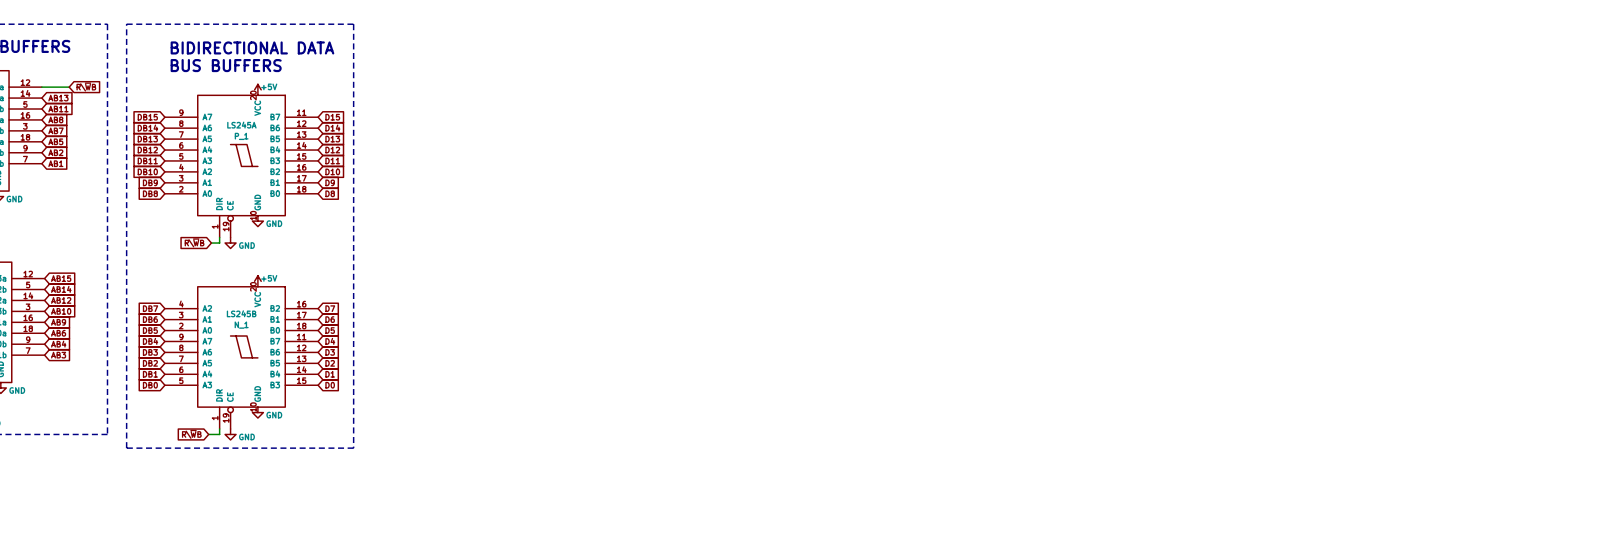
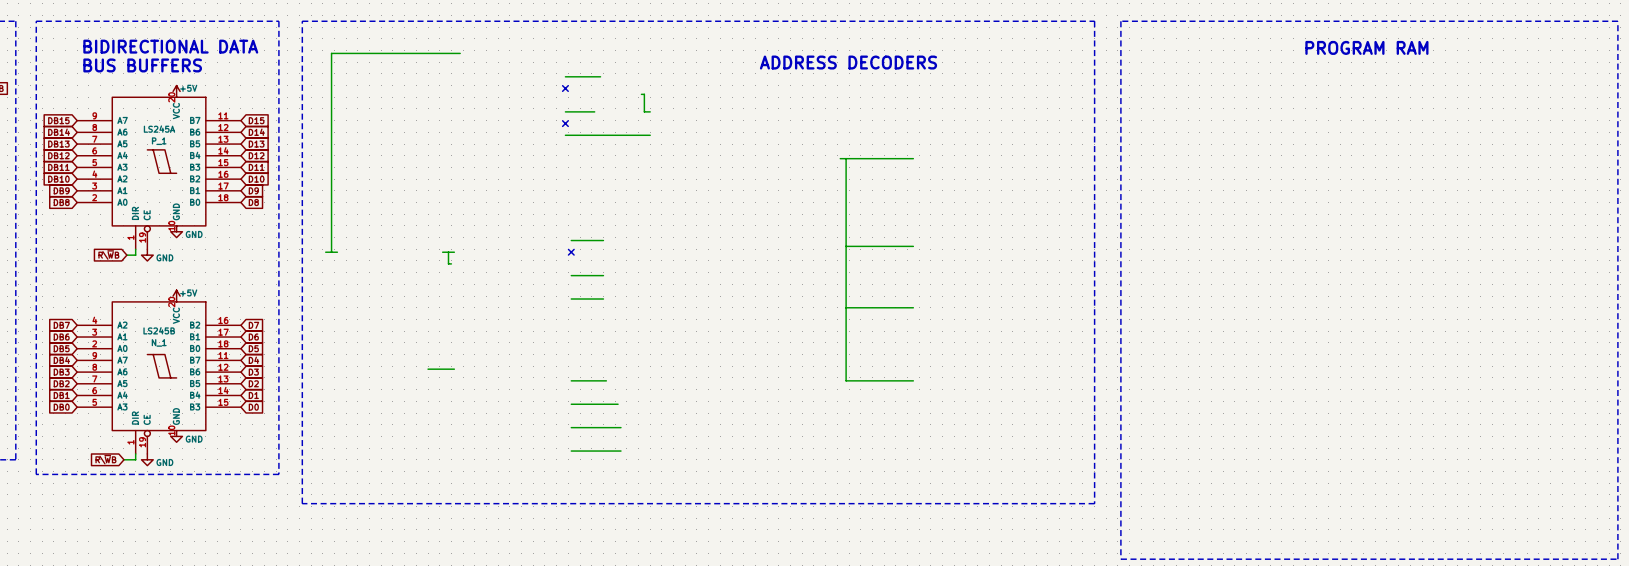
line: none -> (302, 21) (1094, 21) (1094, 503) (302, 503) (302, 21)
line: none -> (1120, 21) (1617, 21) (1617, 559) (1120, 559) (1120, 21)
text: none -> PROGRAM RAM (1366, 47)
wire: none -> (460, 53) (331, 53) (331, 252)
text: none -> ADDRESS DECODERS (848, 62)
wire: none -> (565, 76) (600, 76)
no-connect mark: none -> (565, 88)
wire: none -> (641, 94) (644, 94) (644, 111) (650, 111)
wire: none -> (565, 111) (594, 111)
no-connect mark: none -> (565, 123)
wire: none -> (565, 135) (650, 135)
wire: none -> (840, 158) (913, 158)
wire: none -> (846, 158) (846, 380) (913, 380)
wire: none -> (571, 240) (603, 240)
wire: none -> (846, 246) (913, 246)
wire: none -> (325, 252) (337, 252)
wire: none -> (442, 252) (454, 252)
wire: none -> (448, 252) (448, 263) (451, 263)
no-connect mark: none -> (571, 252)
wire: none -> (571, 275) (603, 275)
wire: none -> (571, 299) (603, 299)
wire: none -> (846, 307) (913, 307)
wire: none -> (428, 369) (454, 369)
wire: none -> (571, 380) (606, 380)
wire: none -> (571, 404) (618, 404)
wire: none -> (571, 427) (620, 427)
wire: none -> (571, 451) (620, 451)

